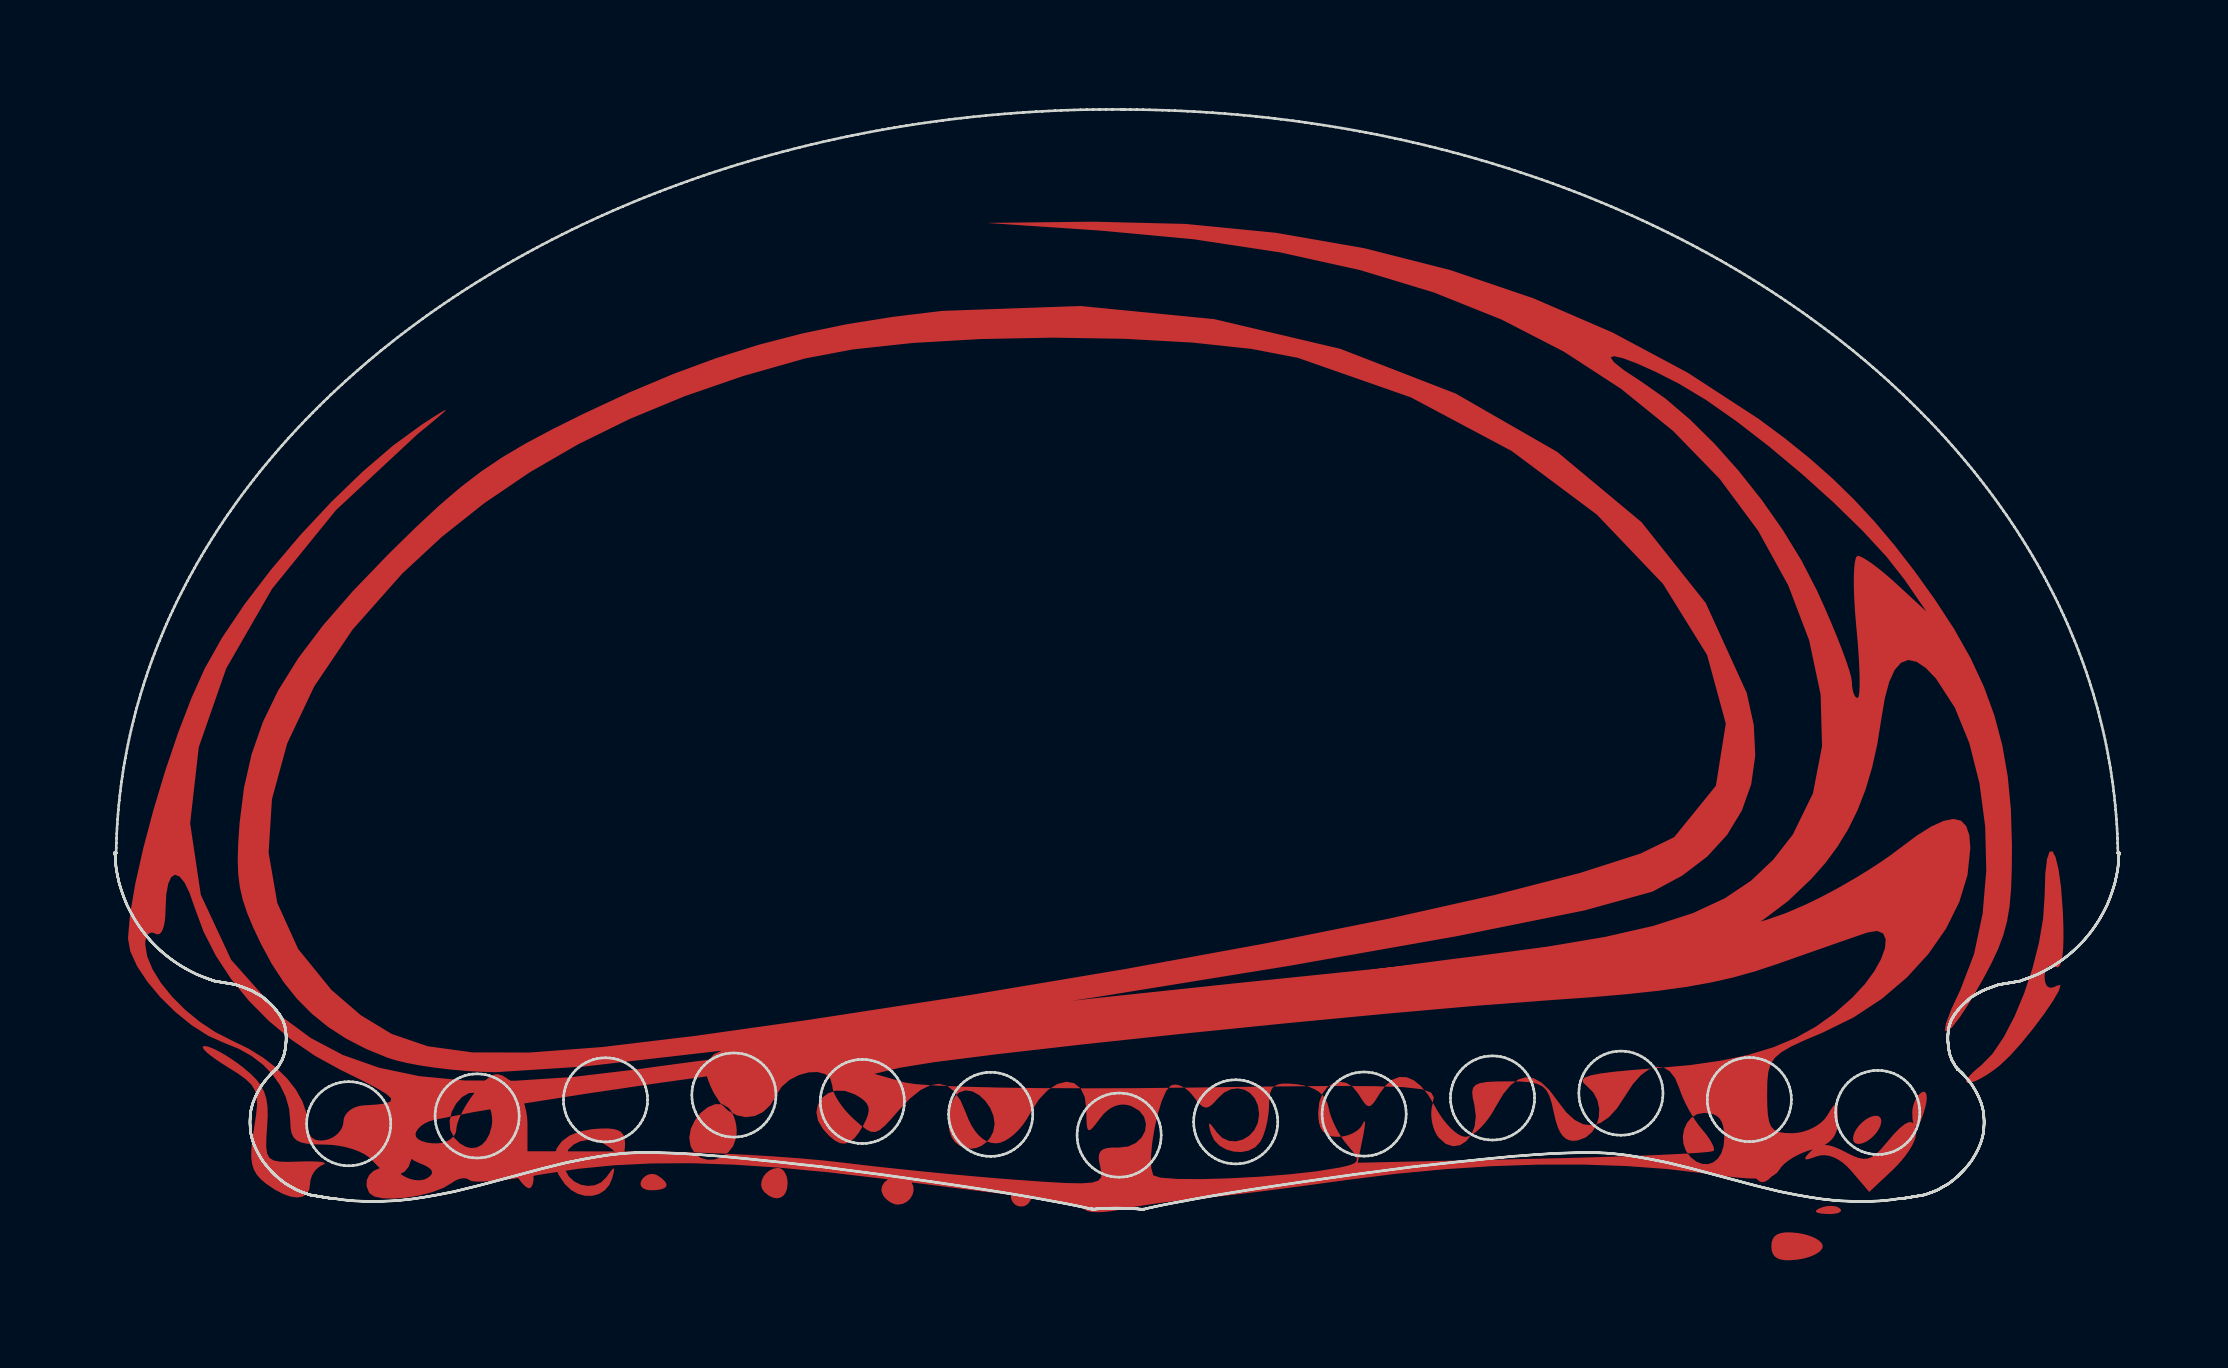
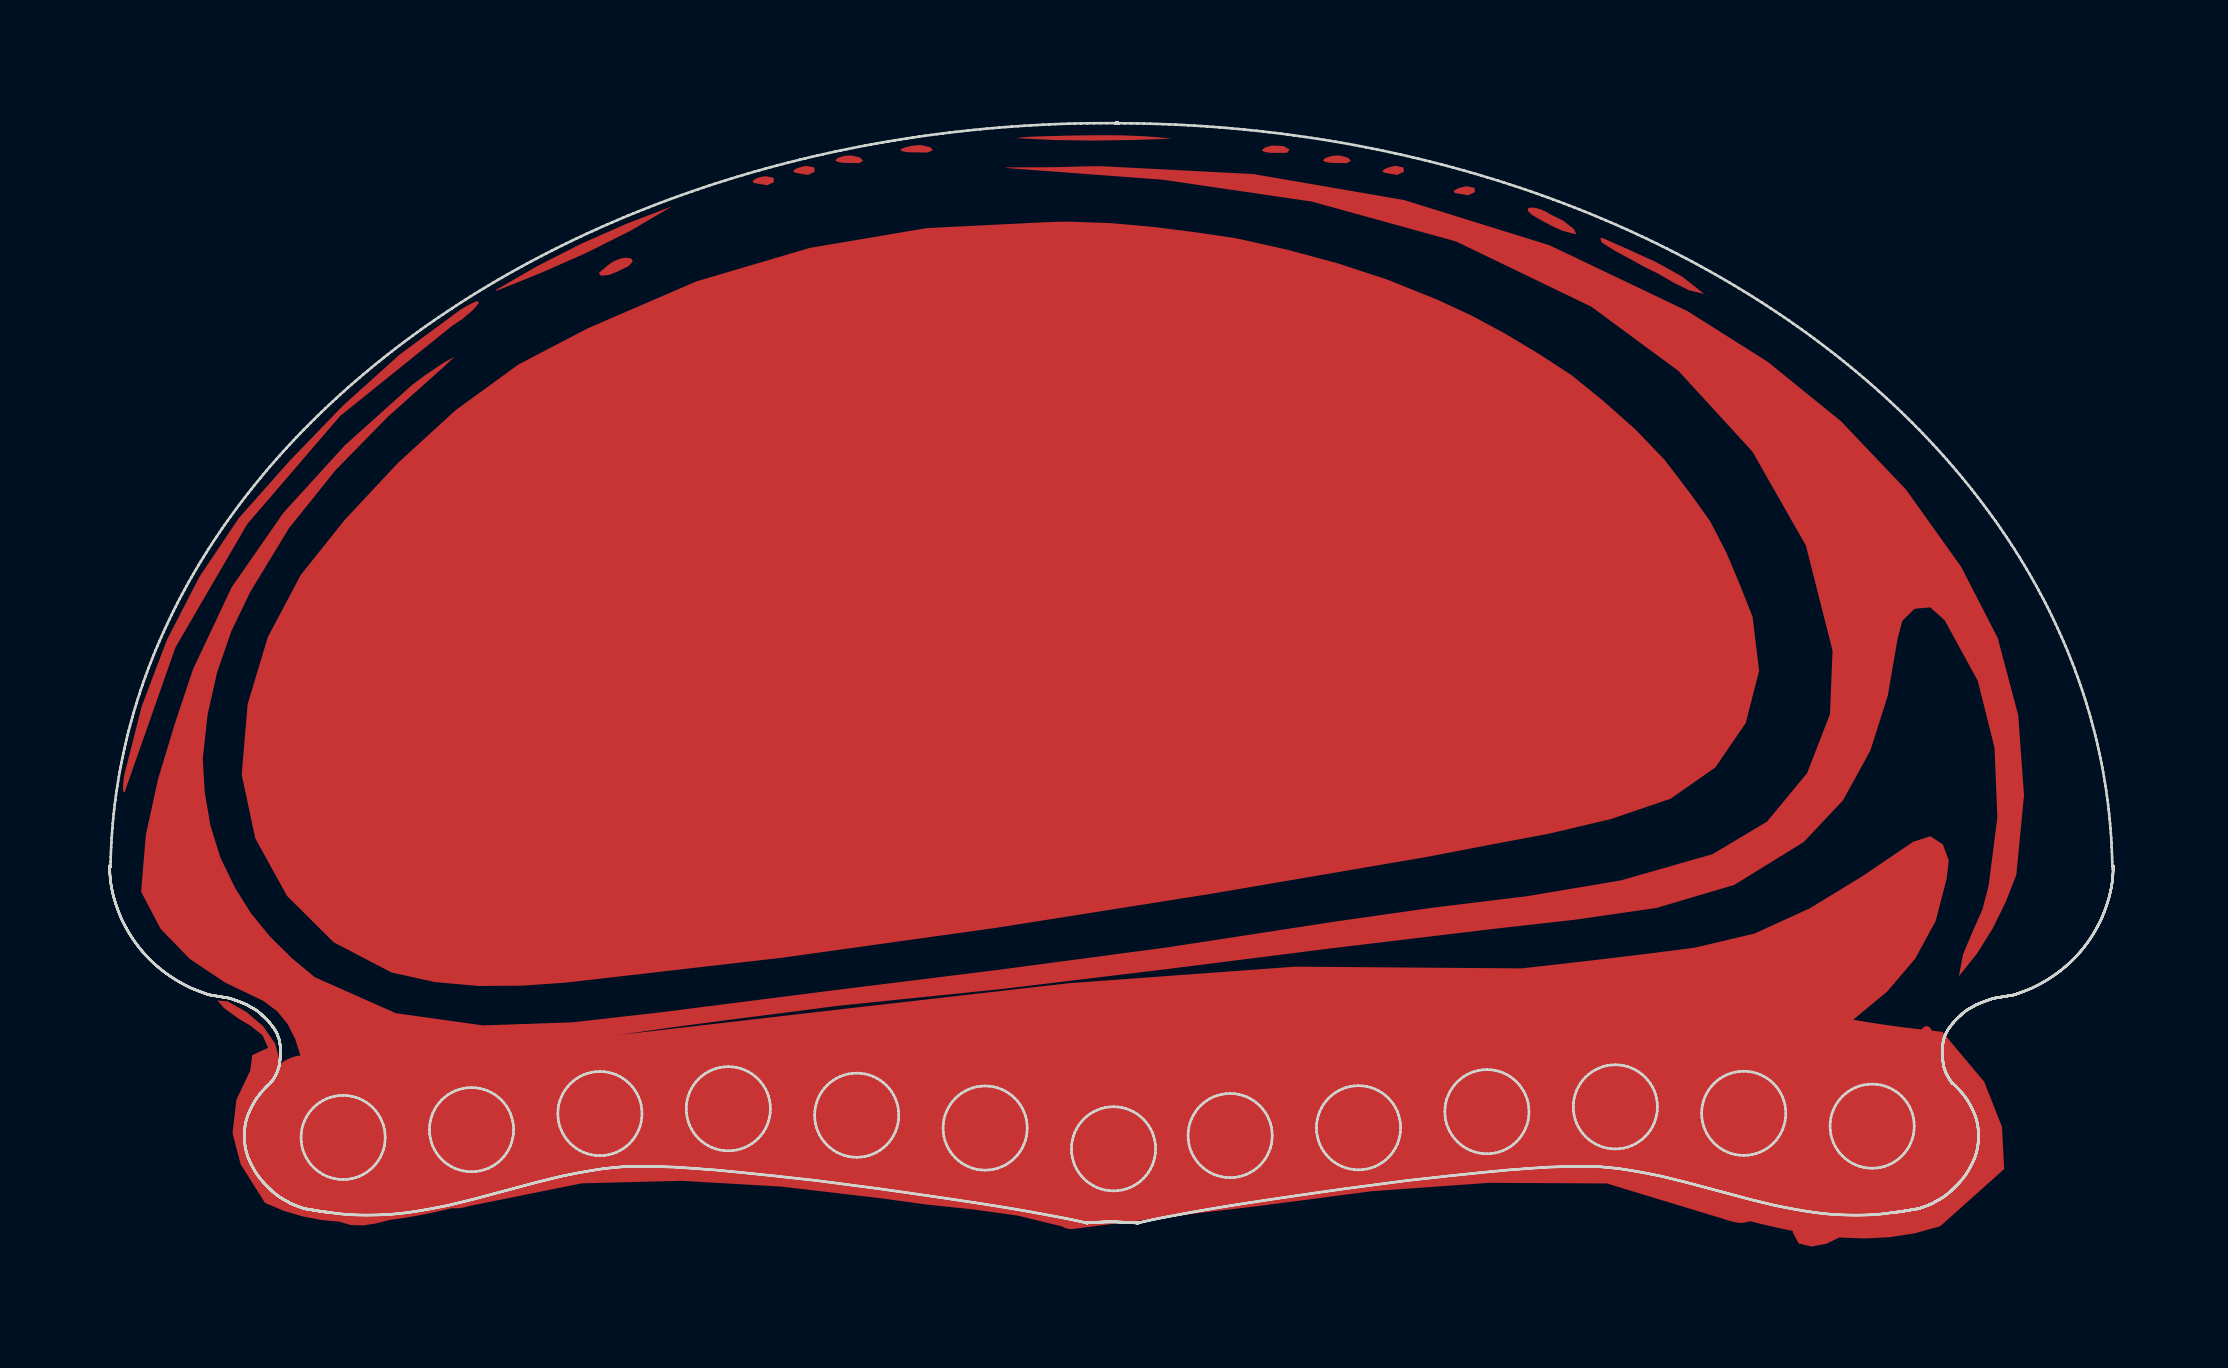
drawing shape: [113, 108, 2121, 1261] -> [108, 121, 2115, 1247]

